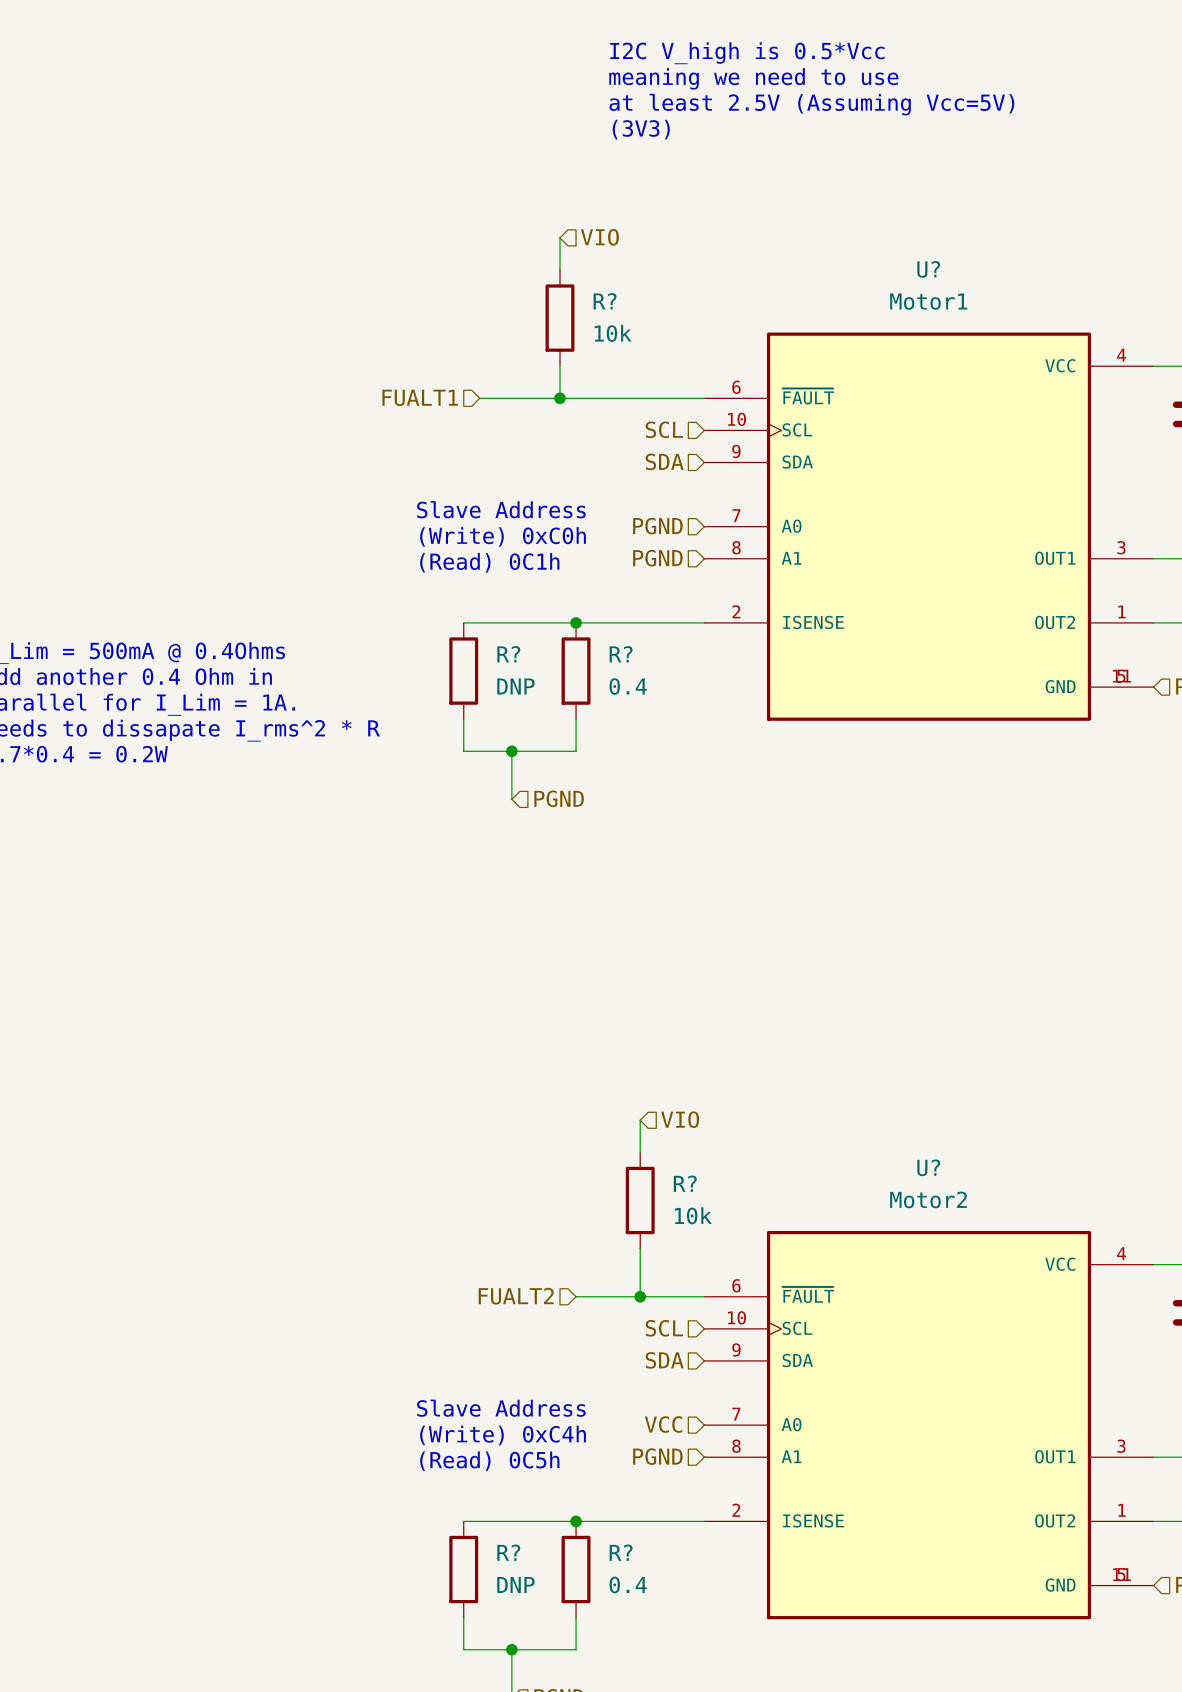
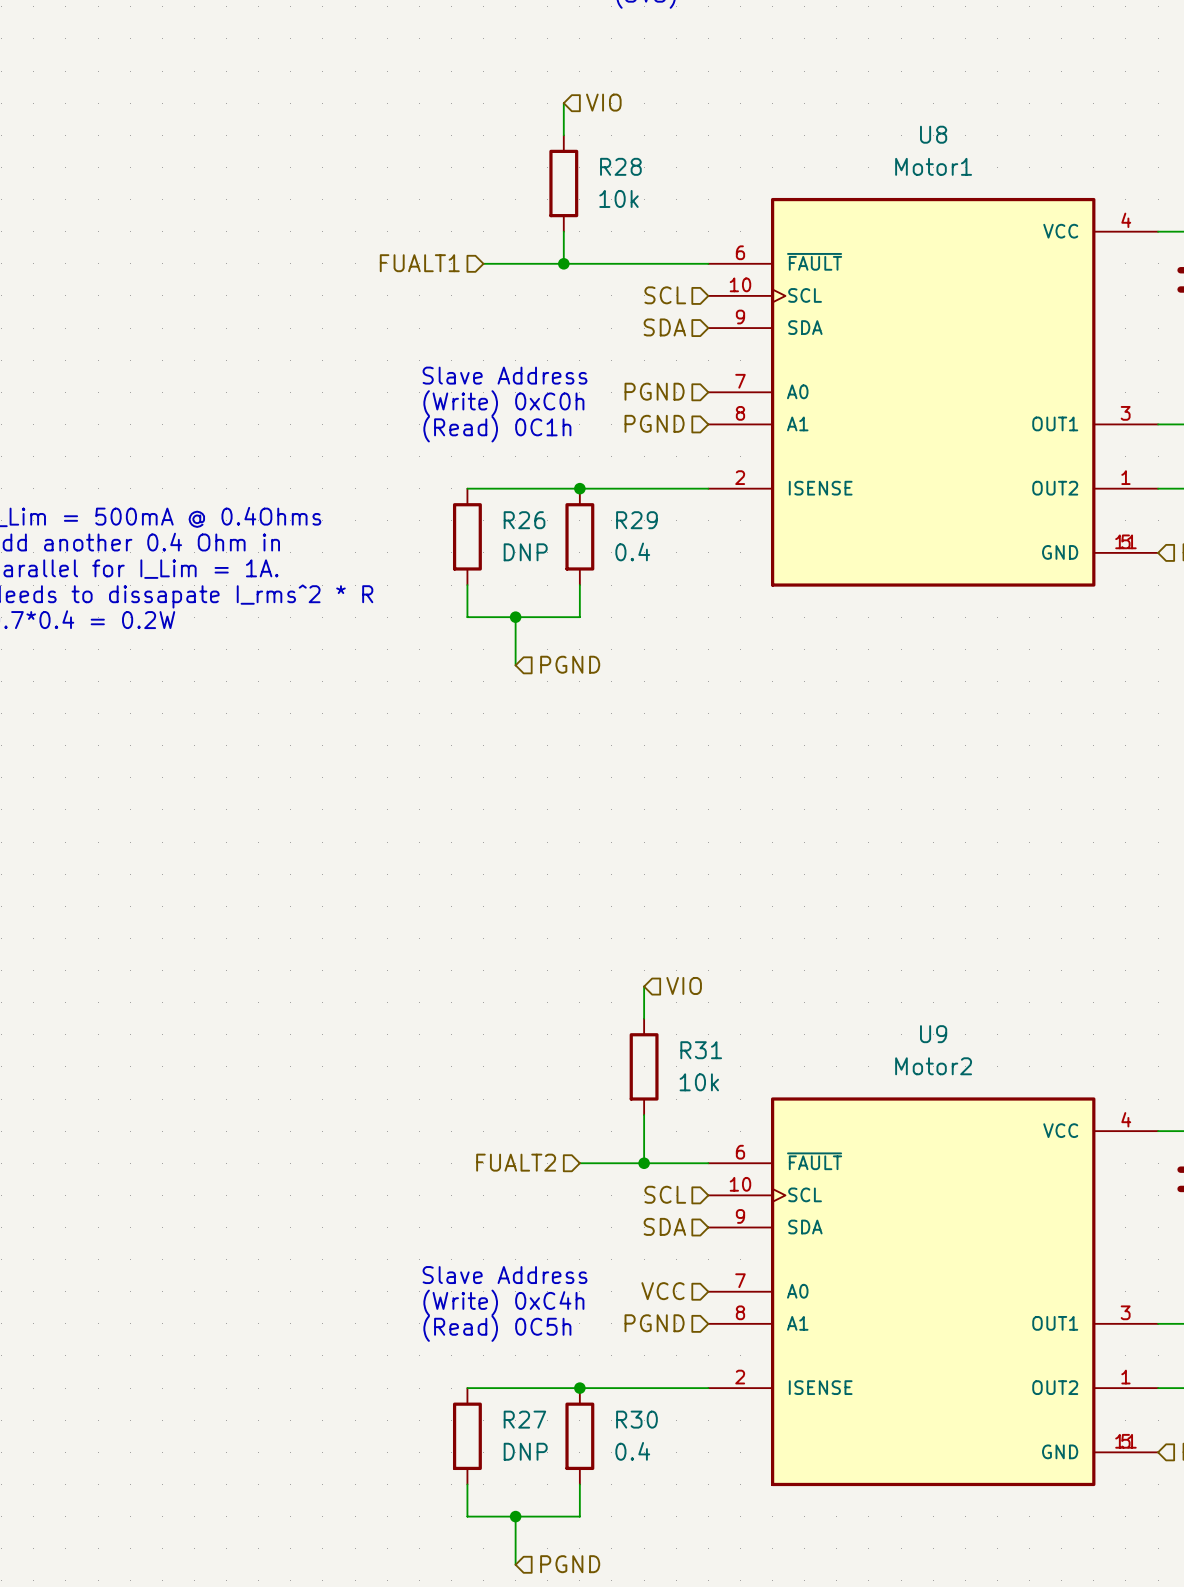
U? name: U? (928, 269) -> U8 (933, 134)
R? name: R? (605, 301) -> R28 (620, 166)
R? name: R? (508, 654) -> R26 (524, 520)
R? name: R? (621, 654) -> R29 (636, 520)
U? name: U? (928, 1167) -> U9 (933, 1034)
R? name: R? (685, 1183) -> R31 (701, 1050)
R? name: R? (508, 1552) -> R27 (524, 1419)
R? name: R? (621, 1552) -> R30 (636, 1419)

